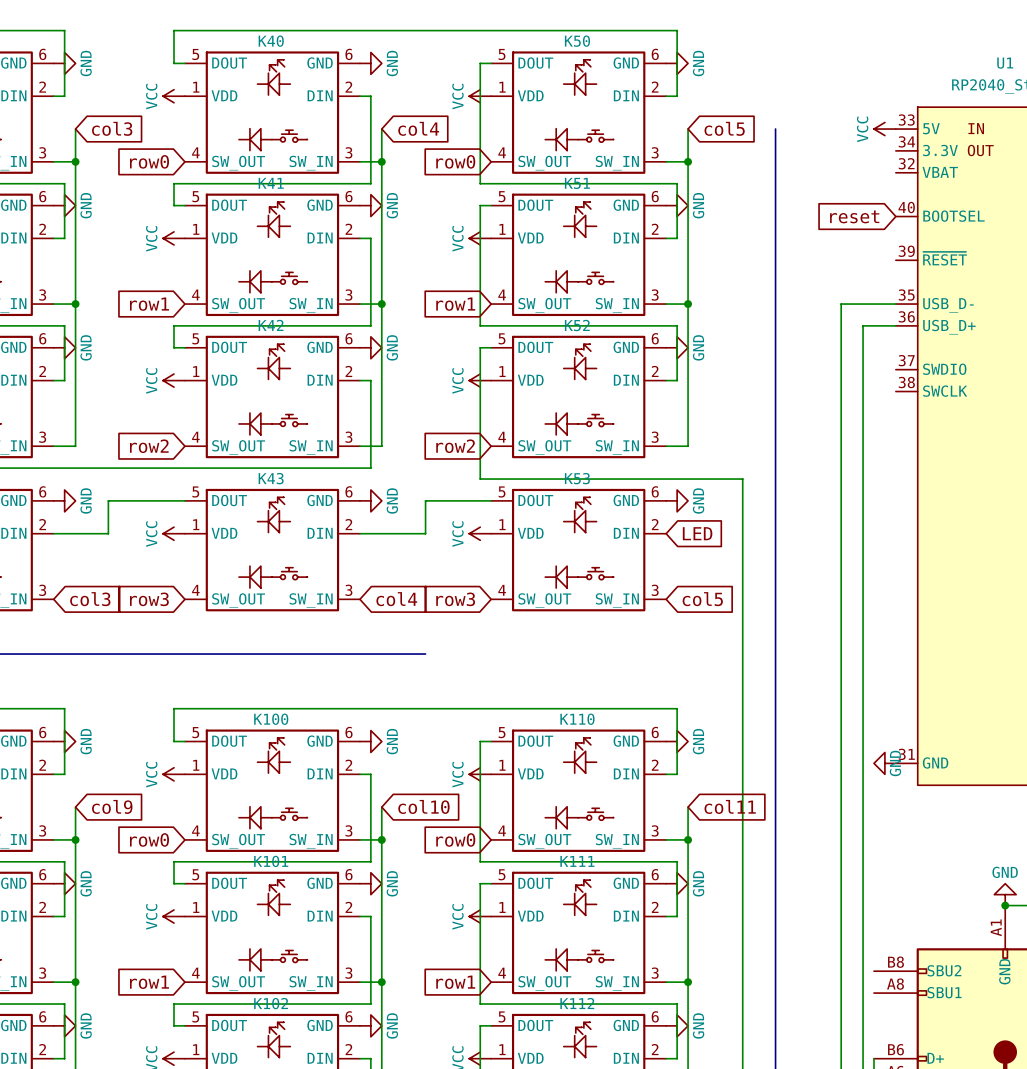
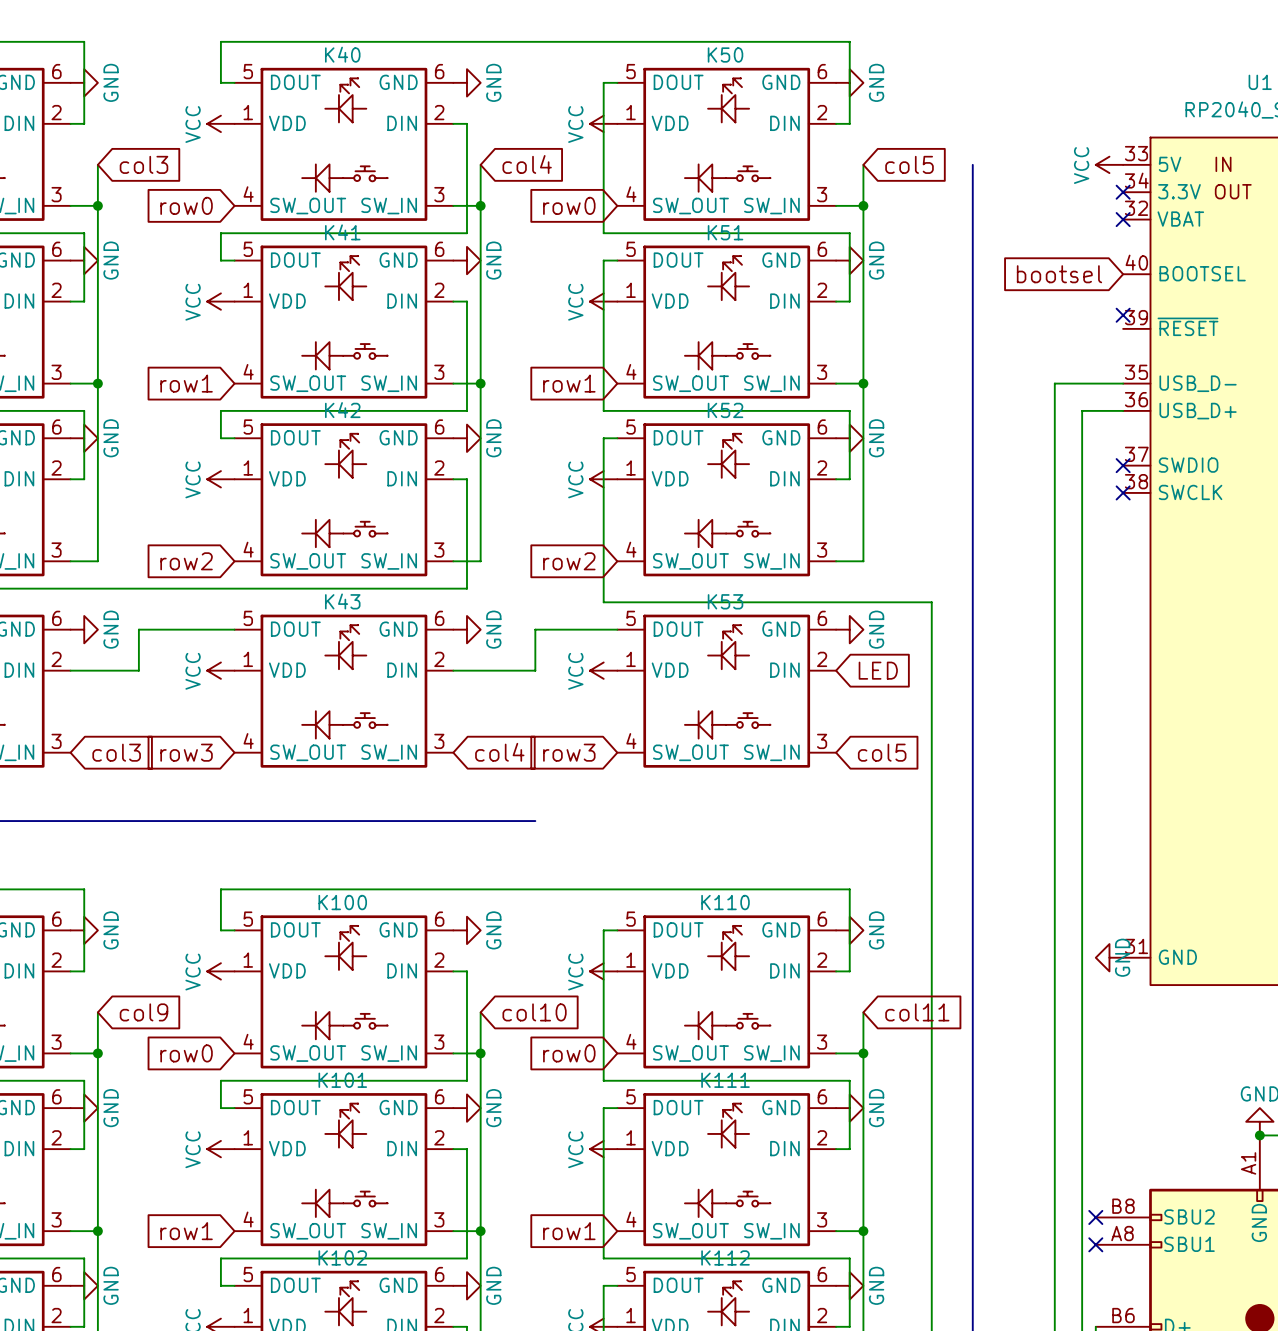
no-connect mark: none -> (1123, 192)
no-connect mark: none -> (1123, 219)
global label: reset (854, 216) -> bootsel (1059, 274)
no-connect mark: none -> (1123, 315)
no-connect mark: none -> (1123, 465)
no-connect mark: none -> (1123, 492)
no-connect mark: none -> (1095, 1217)
no-connect mark: none -> (1095, 1244)

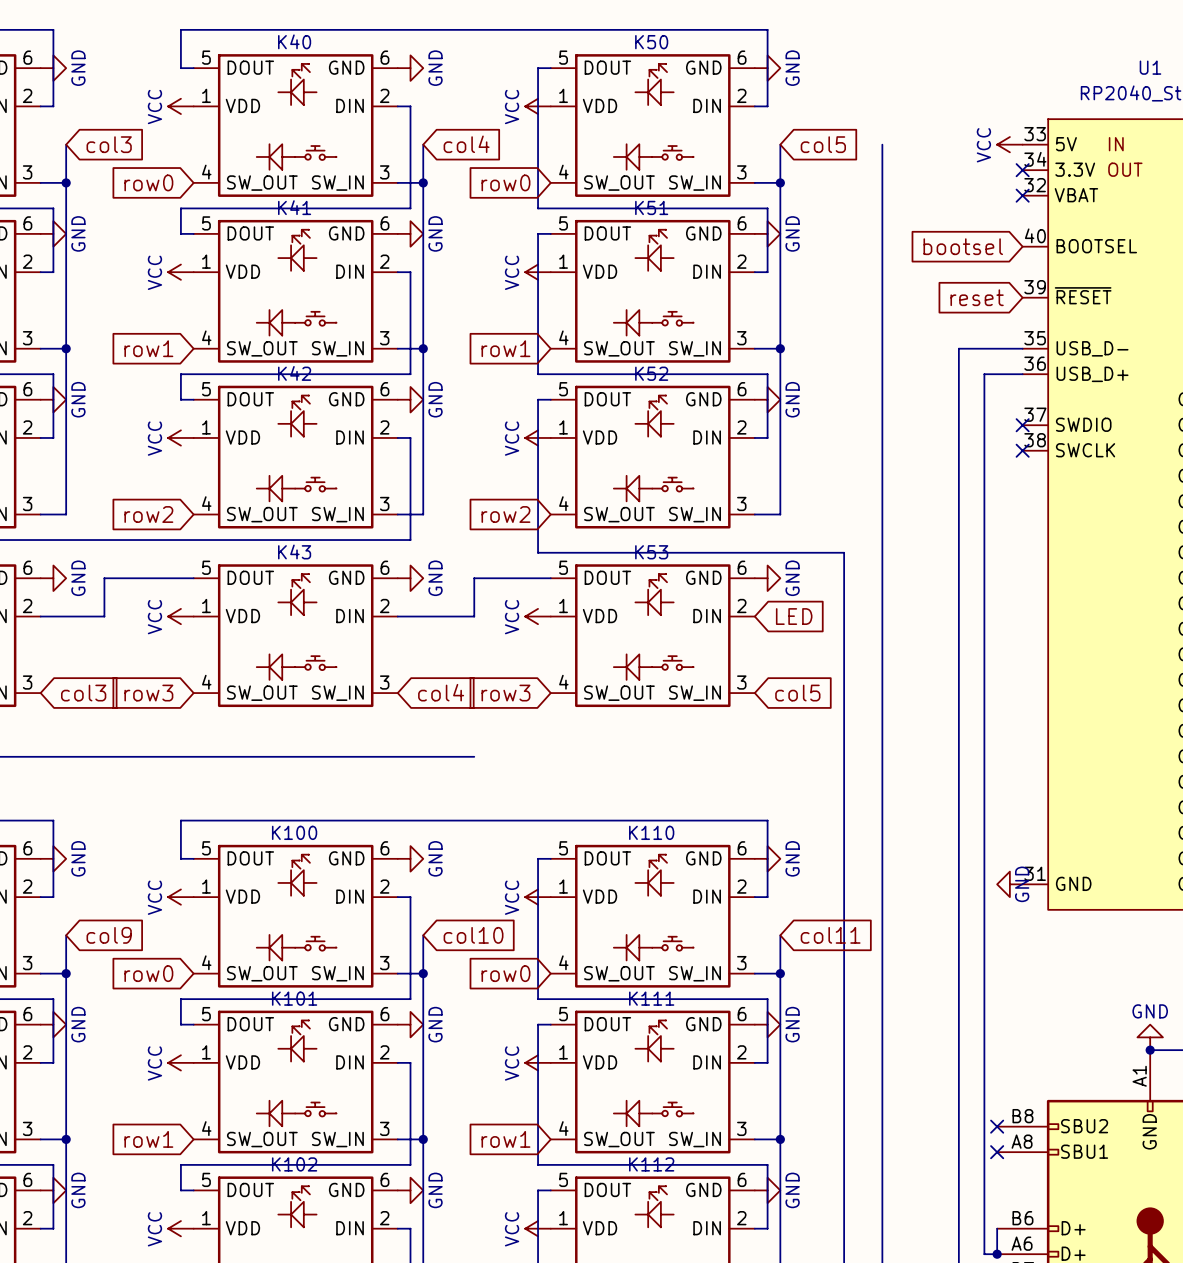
no-connect mark: (1123, 315) -> none
global label: none -> reset (977, 297)

